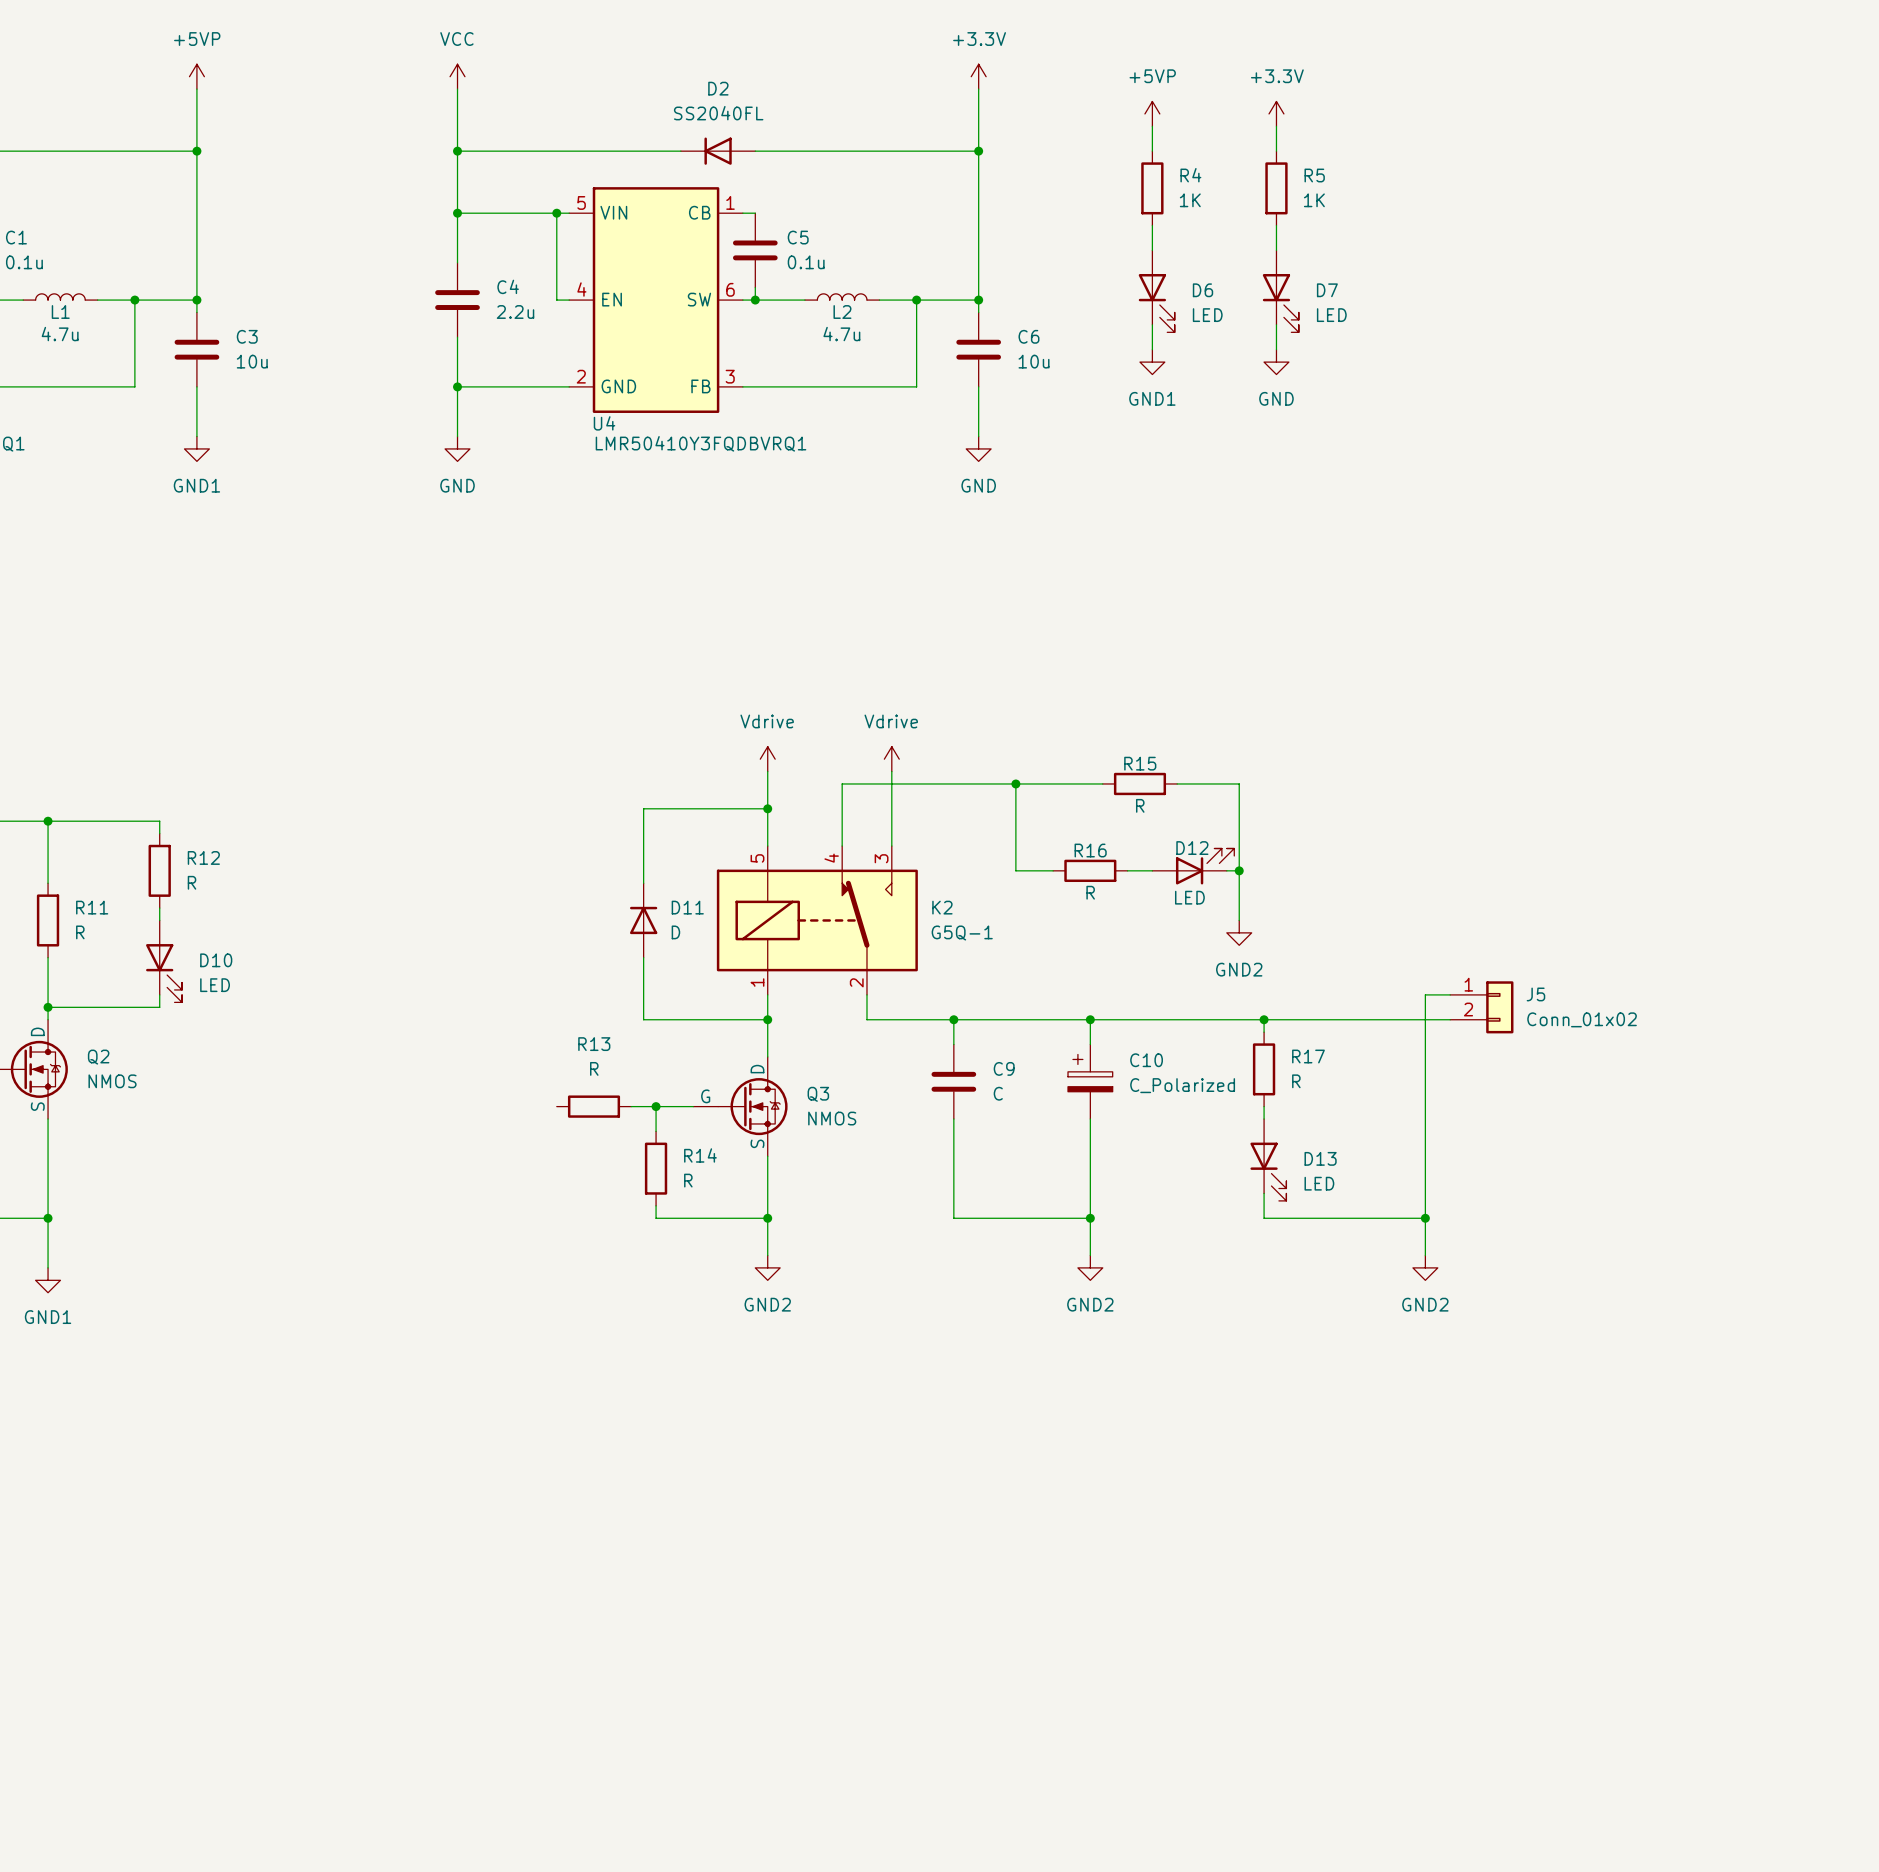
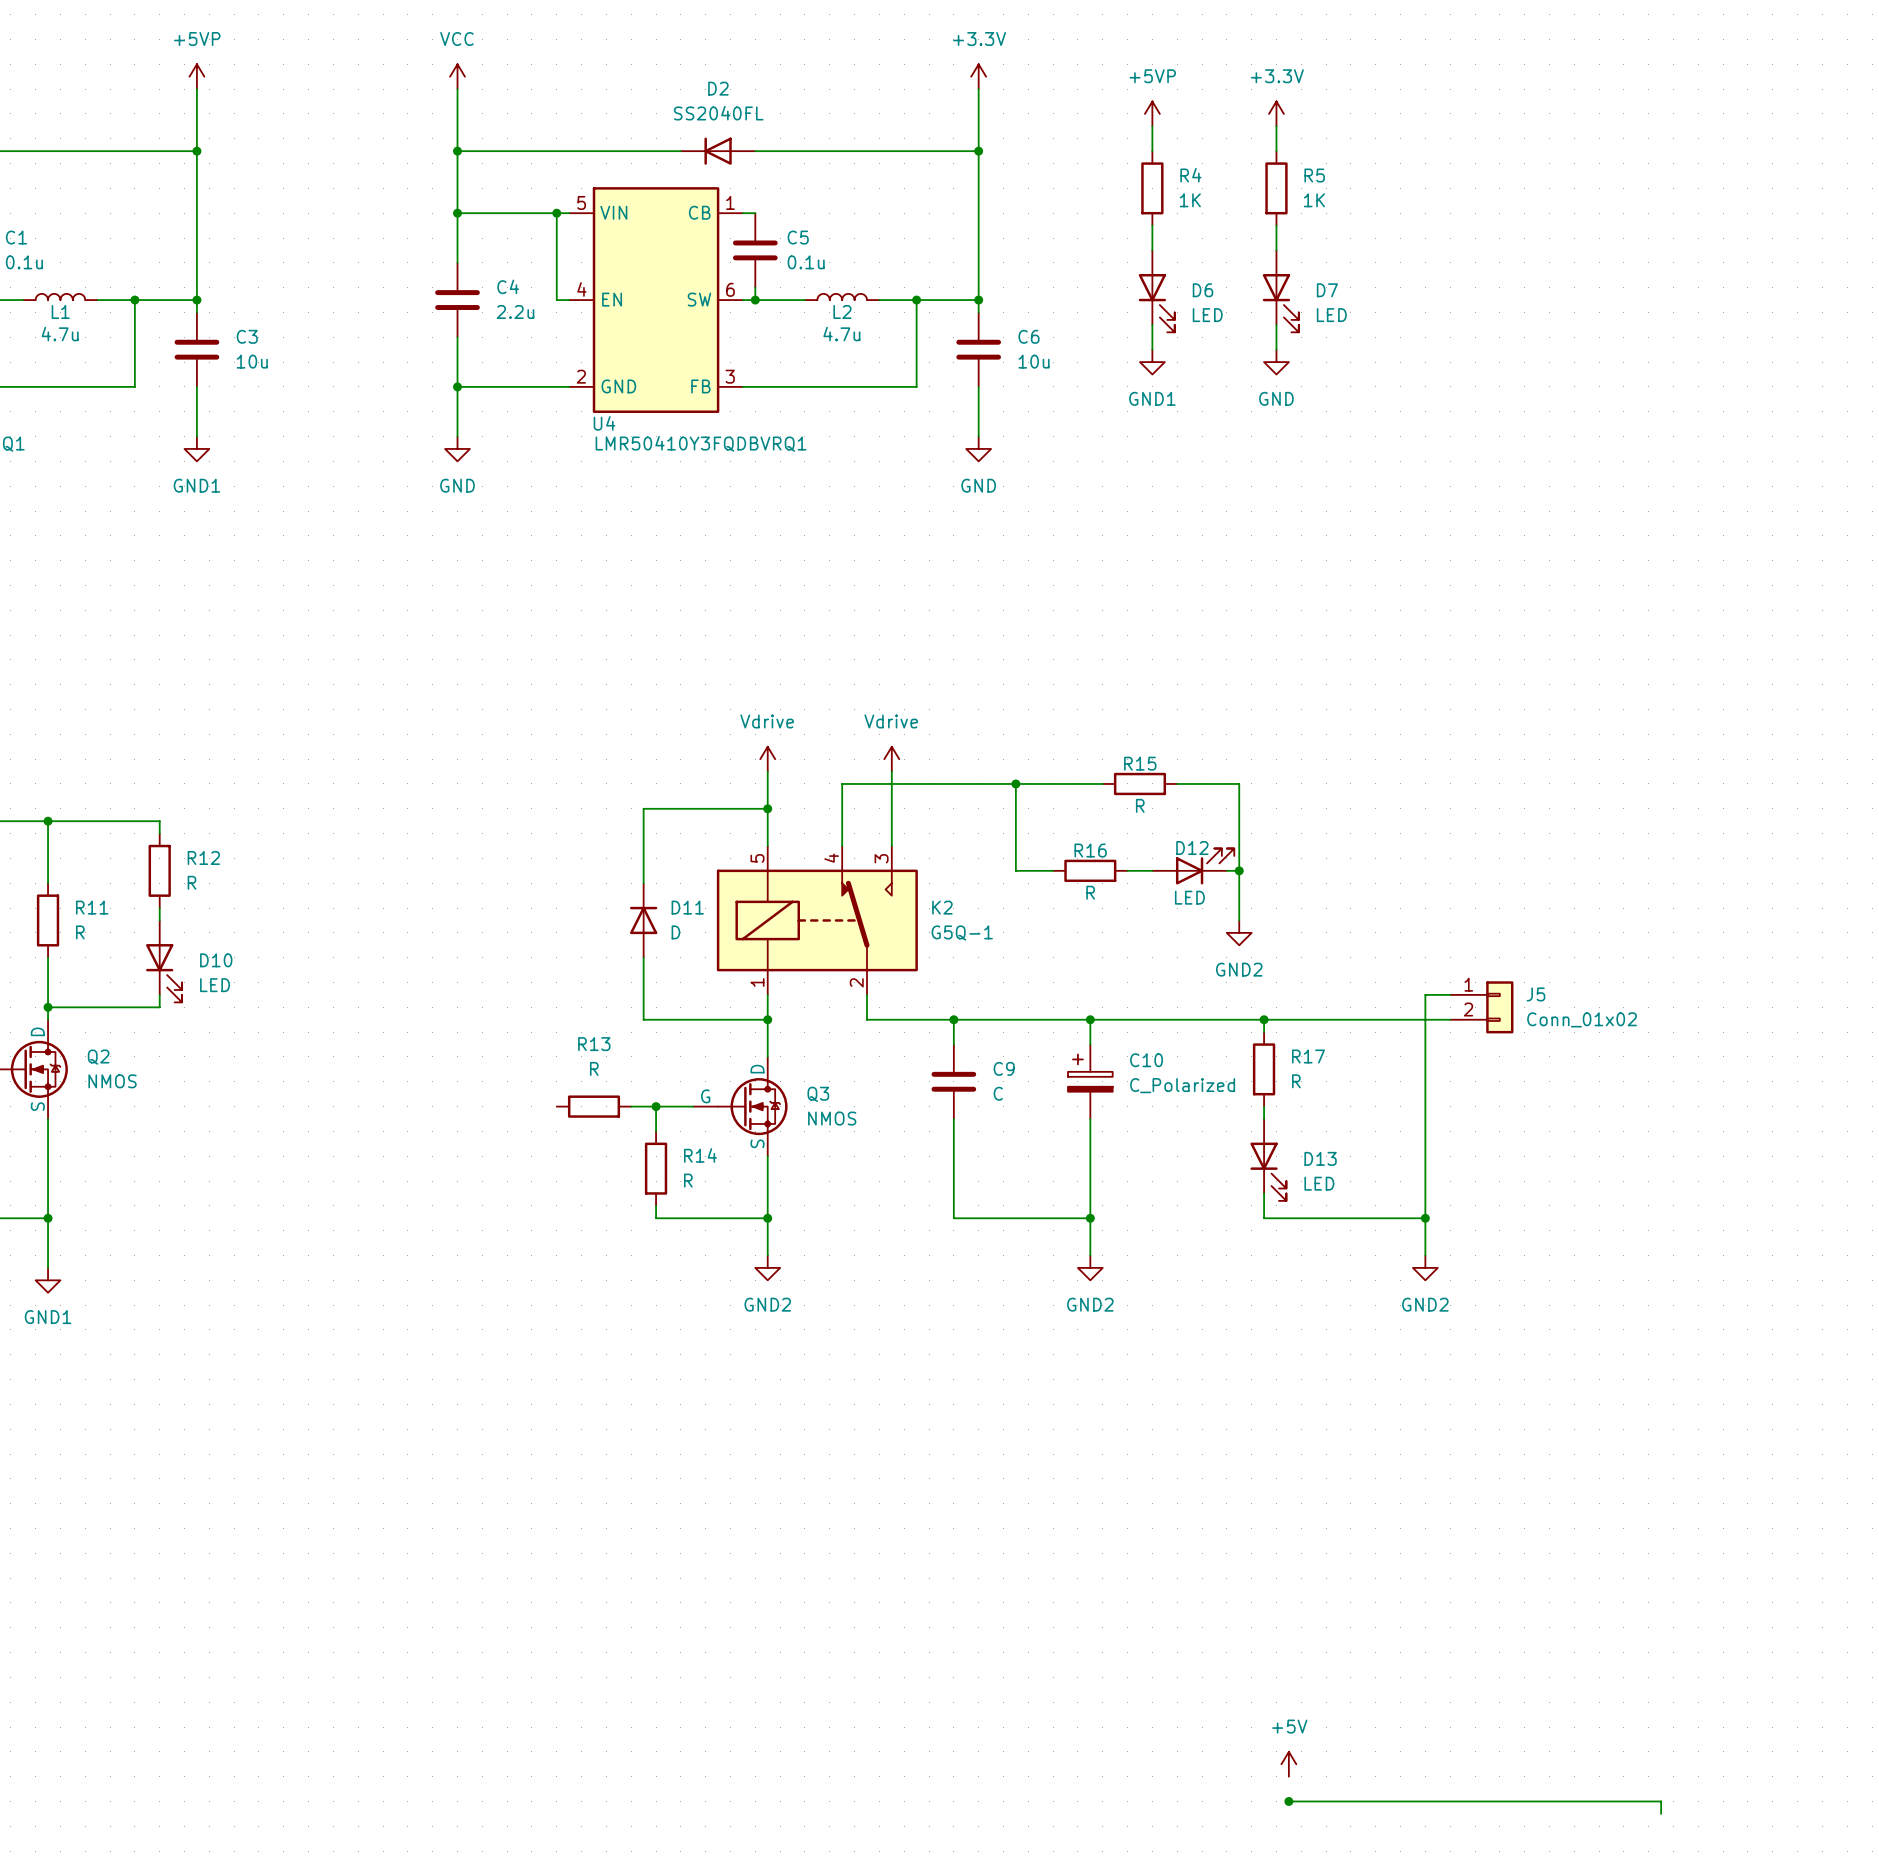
power symbol: none -> +5V (1288, 1764)
wire: none -> (1288, 1801) (1661, 1801) (1661, 1813)
junction: none -> (1288, 1801)

